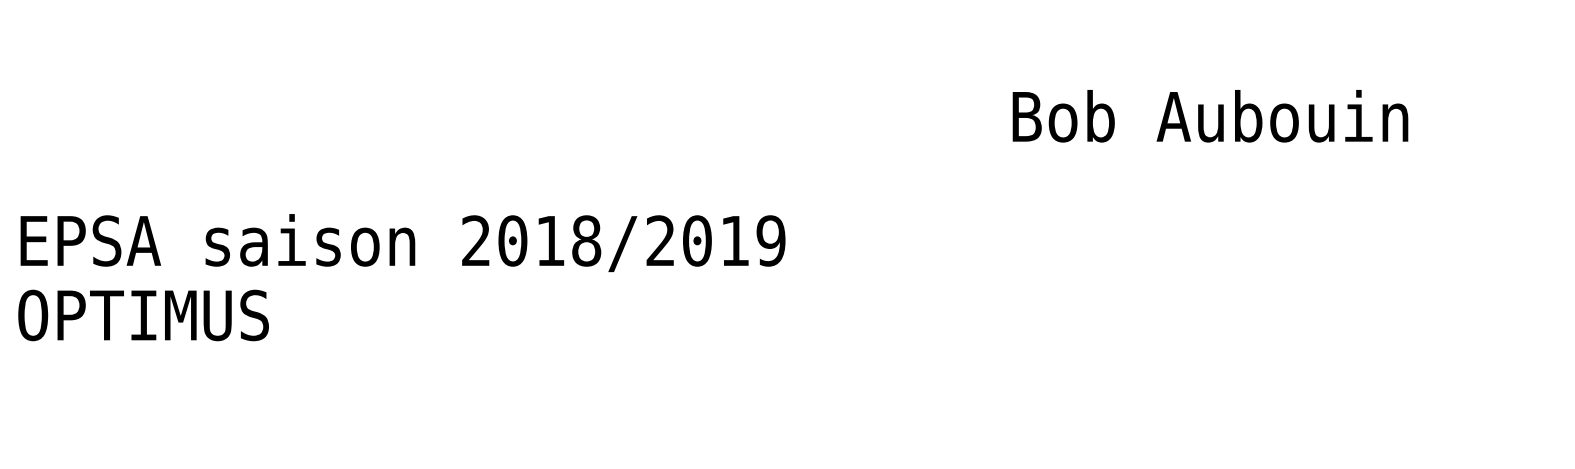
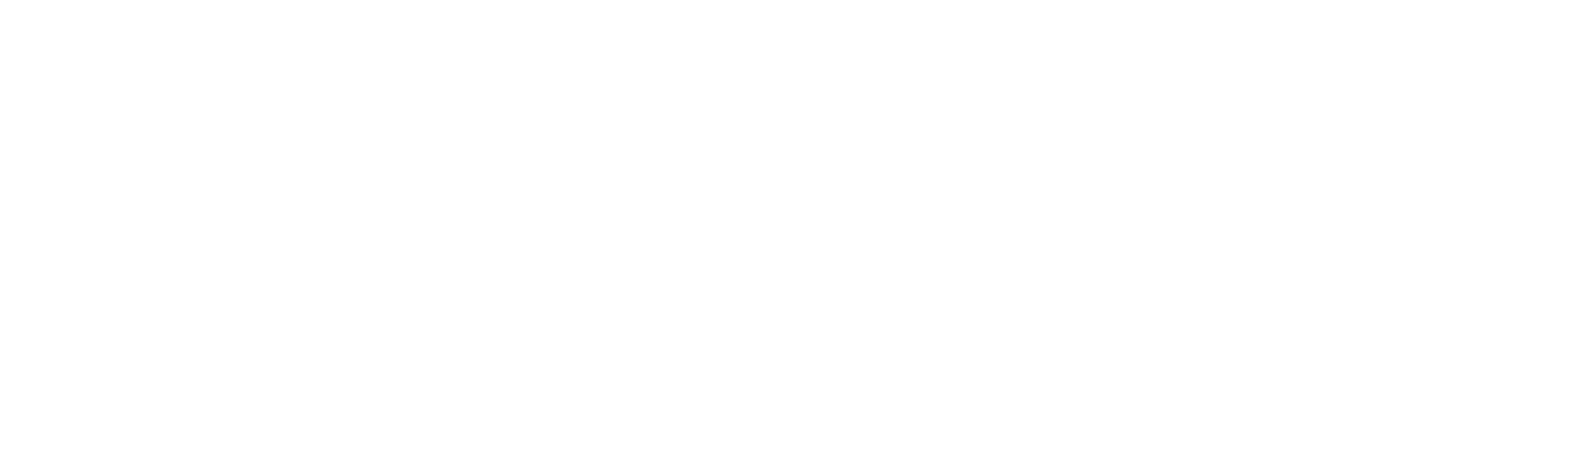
text: Bob Aubouin (1210, 116) -> none
text: EPSA saison 2018/2019 (403, 243) -> none
text: OPTIMUS (143, 315) -> none

